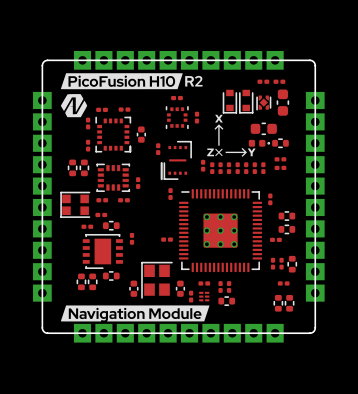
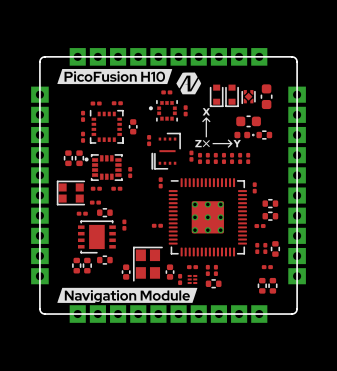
drawing: [185, 75, 203, 87] -> none
part: (263, 81) -> none
part: (279, 81) -> none
drawing position: (74, 105) -> (188, 83)
part footprint: [165, 106, 189, 129] -> [148, 100, 178, 122]
part: (280, 159) -> none
part footprint: [96, 163, 131, 192] -> [84, 154, 123, 181]
part: (280, 167) -> none

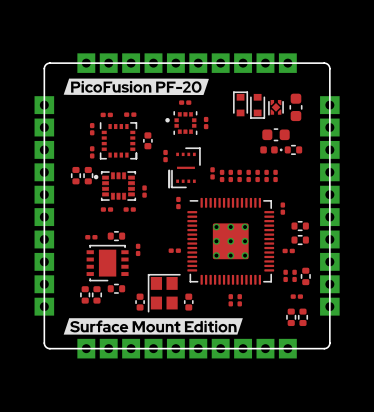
drawing shape: [57, 68, 173, 85] -> [63, 78, 209, 96]
drawing: [176, 72, 202, 95] -> none
part rotation: 0° (216, 95) -> 180° (240, 103)
drawing: [195, 108, 241, 148] -> none
part: (70, 193) -> none
part: (95, 202) -> none
part: (192, 267) -> none
part: (180, 279) -> none
part: (192, 279) -> none
part: (213, 283) -> none
drawing: none -> [63, 318, 243, 335]
drawing: [57, 287, 198, 303] -> none

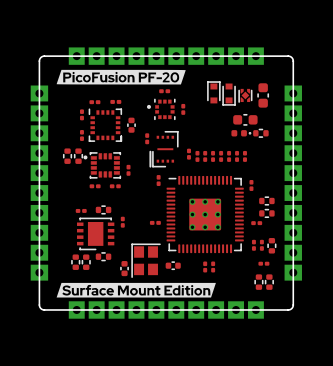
part rotation: 0° (188, 302) -> 90° clockwise (173, 265)

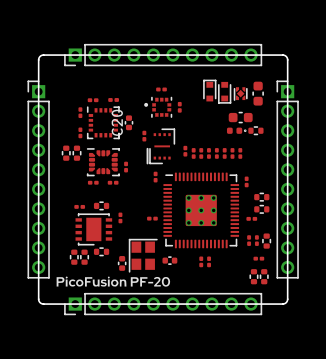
part footprint: [68, 47, 264, 65] -> [64, 44, 262, 66]
drawing: [56, 69, 186, 85] -> none
part footprint: [30, 85, 49, 281] -> [27, 80, 50, 279]
part footprint: [284, 85, 302, 281] -> [276, 80, 299, 279]
C20 name: none -> C20 (117, 122)
part footprint: [83, 152, 121, 179] -> [87, 148, 120, 177]
drawing: none -> [56, 276, 171, 287]
drawing: [56, 282, 216, 298] -> none
part footprint: [68, 301, 264, 319] -> [64, 293, 262, 315]

